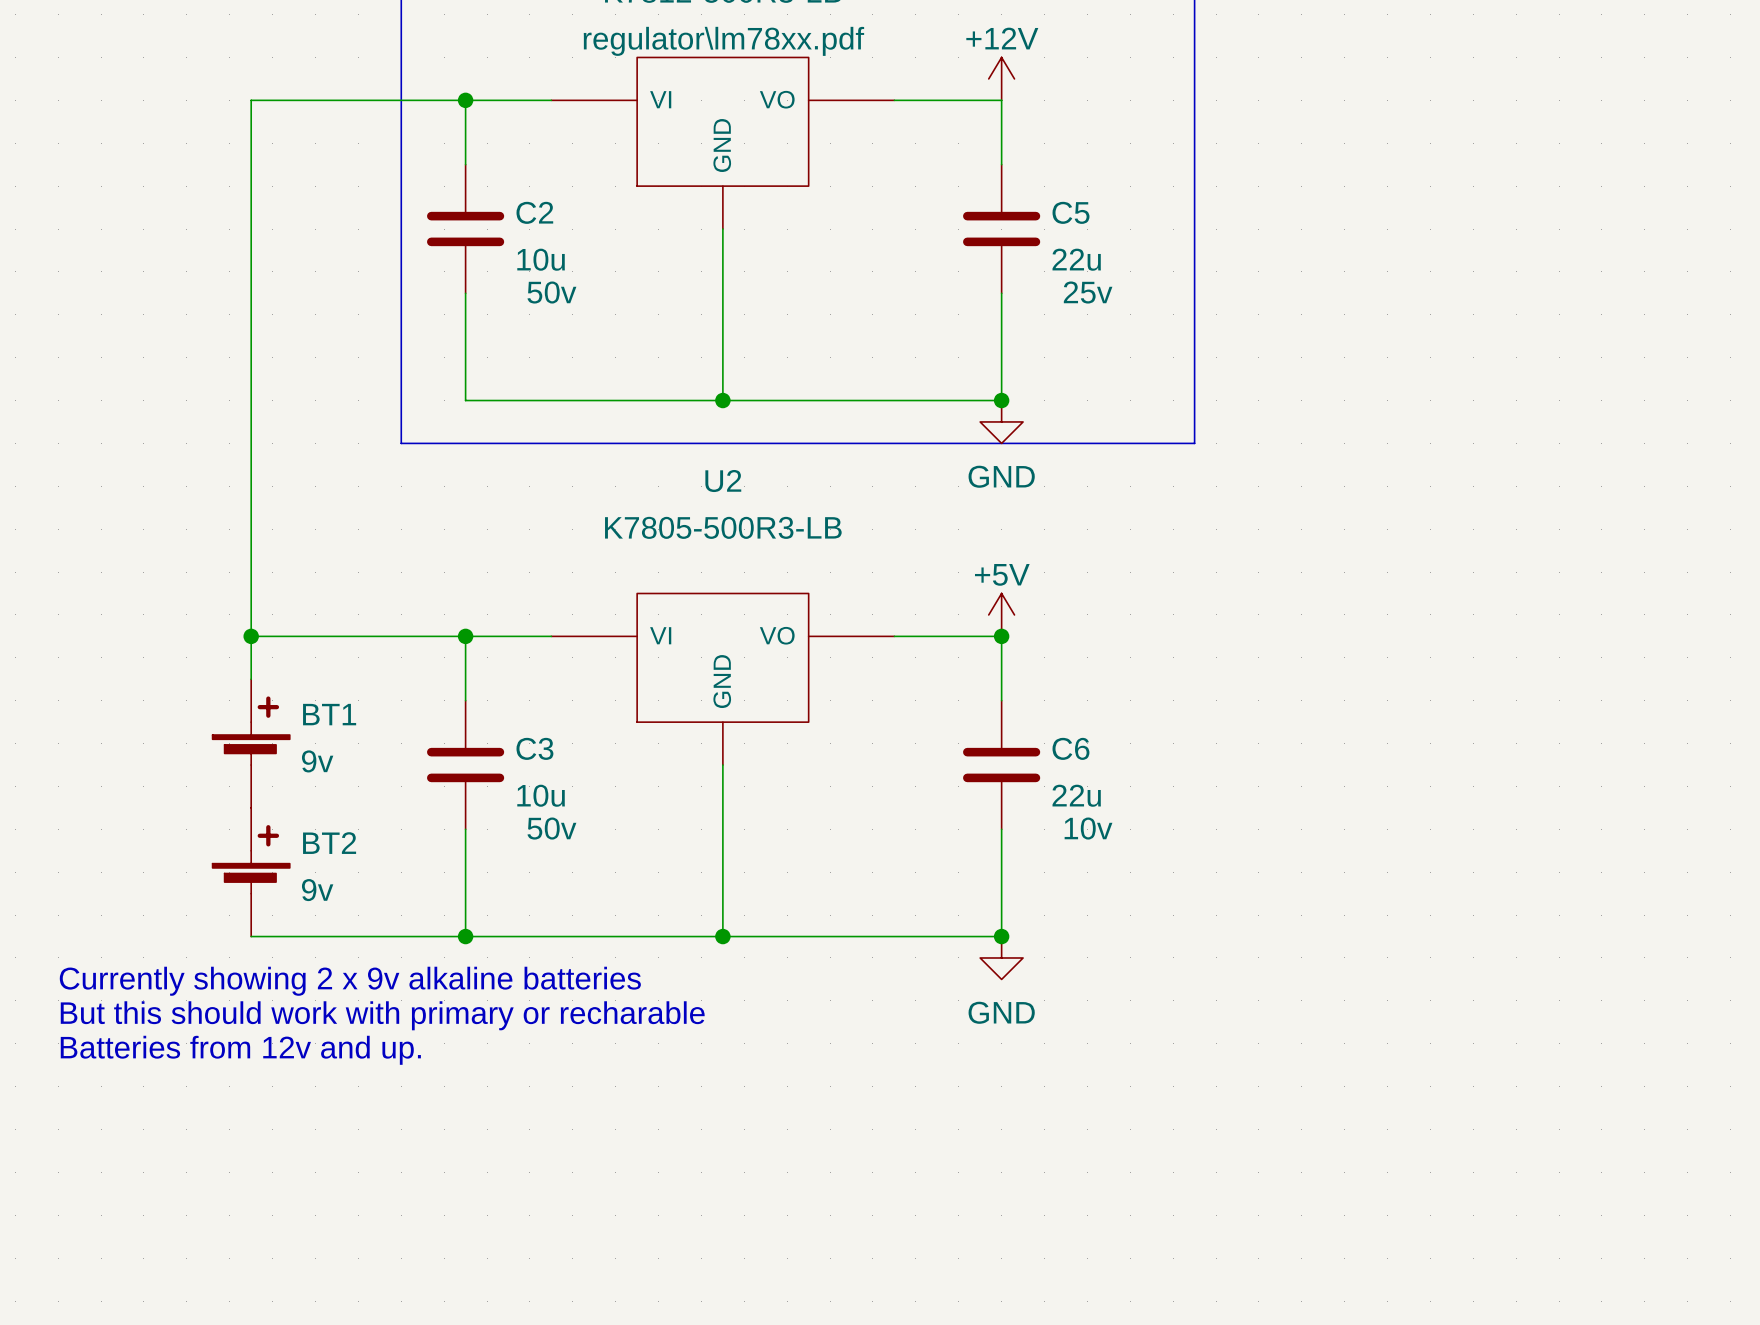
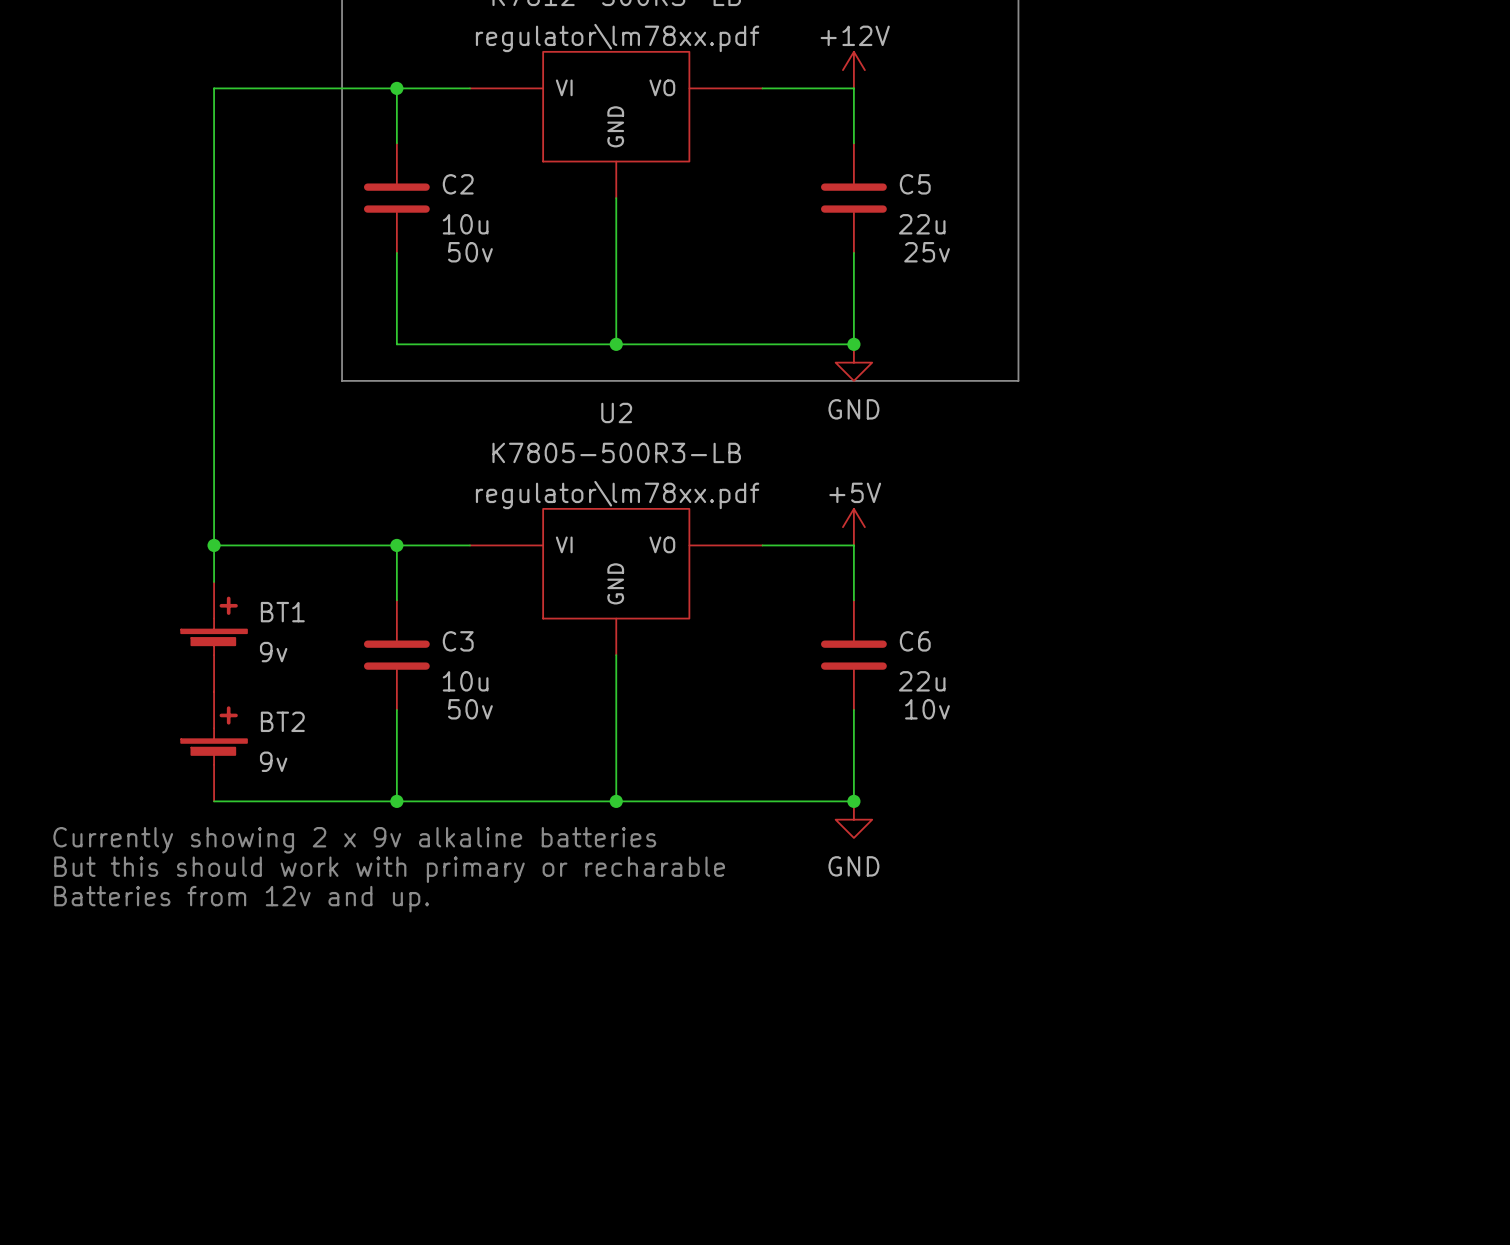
U2 text: none -> regulator\lm78xx.pdf (617, 495)
junction: (1001, 636) -> none

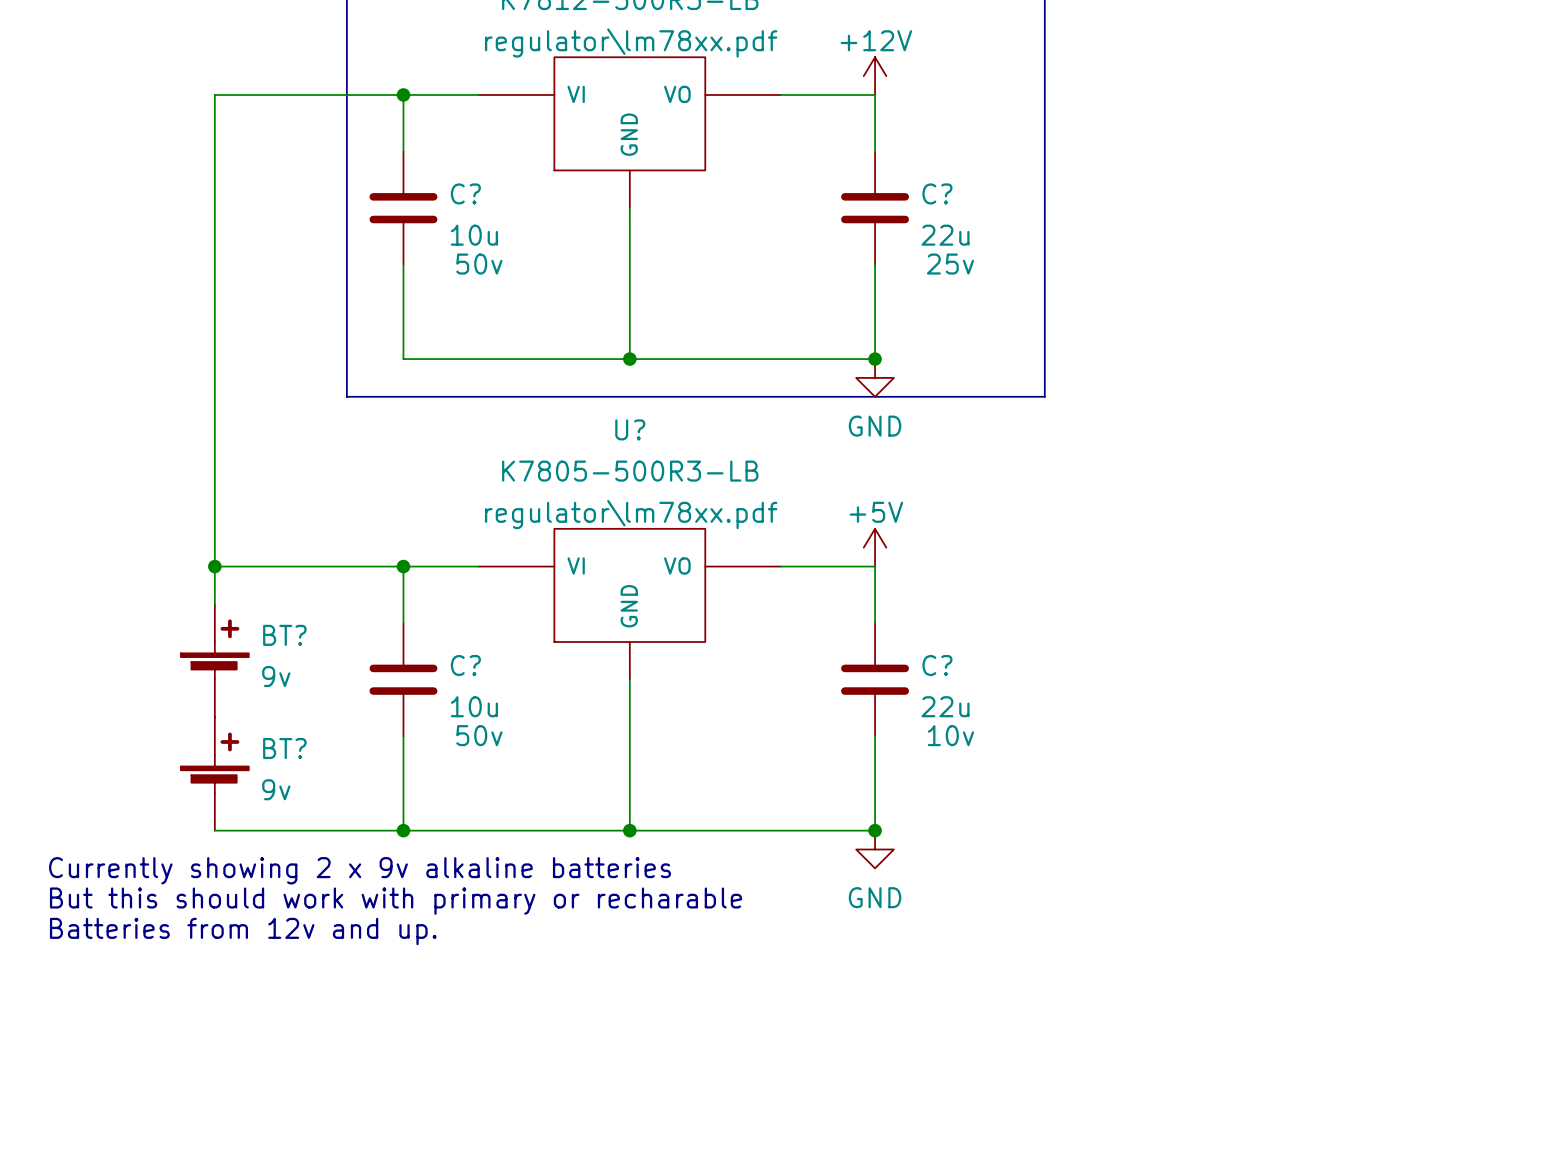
C2 name: C2 (458, 184) -> C? (465, 193)
C5 name: C5 (915, 184) -> C? (937, 193)
U2 name: U2 (616, 412) -> U? (630, 429)
BT1 name: BT1 (282, 612) -> BT? (284, 635)
C3 name: C3 (458, 641) -> C? (465, 665)
C6 name: C6 (915, 641) -> C? (937, 665)
BT2 name: BT2 (282, 721) -> BT? (284, 748)

